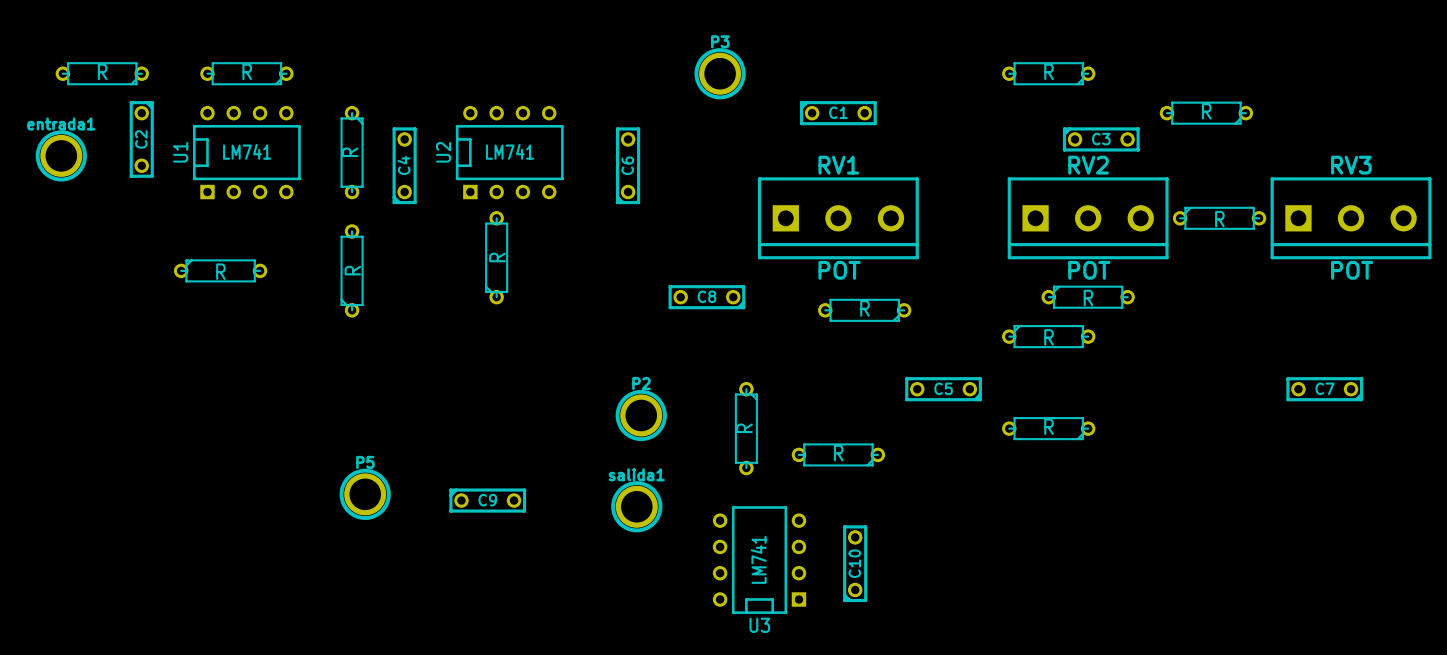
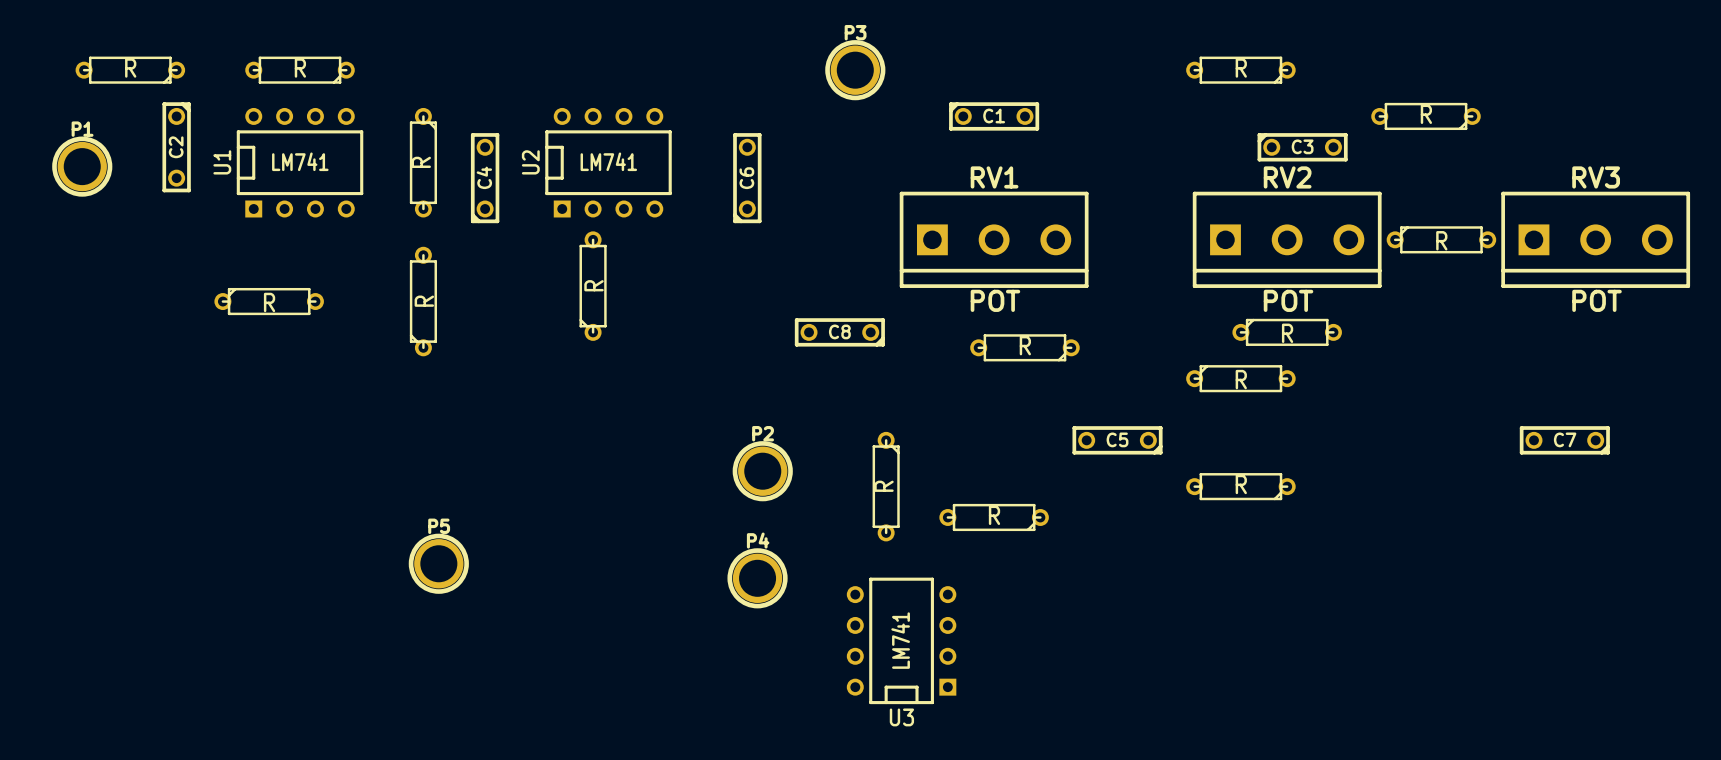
entrada1 name: entrada1 (61, 123) -> P1 (82, 129)
salida1 name: salida1 (636, 474) -> P4 (758, 540)
C9: (487, 500) -> none
C10: (855, 563) -> none

